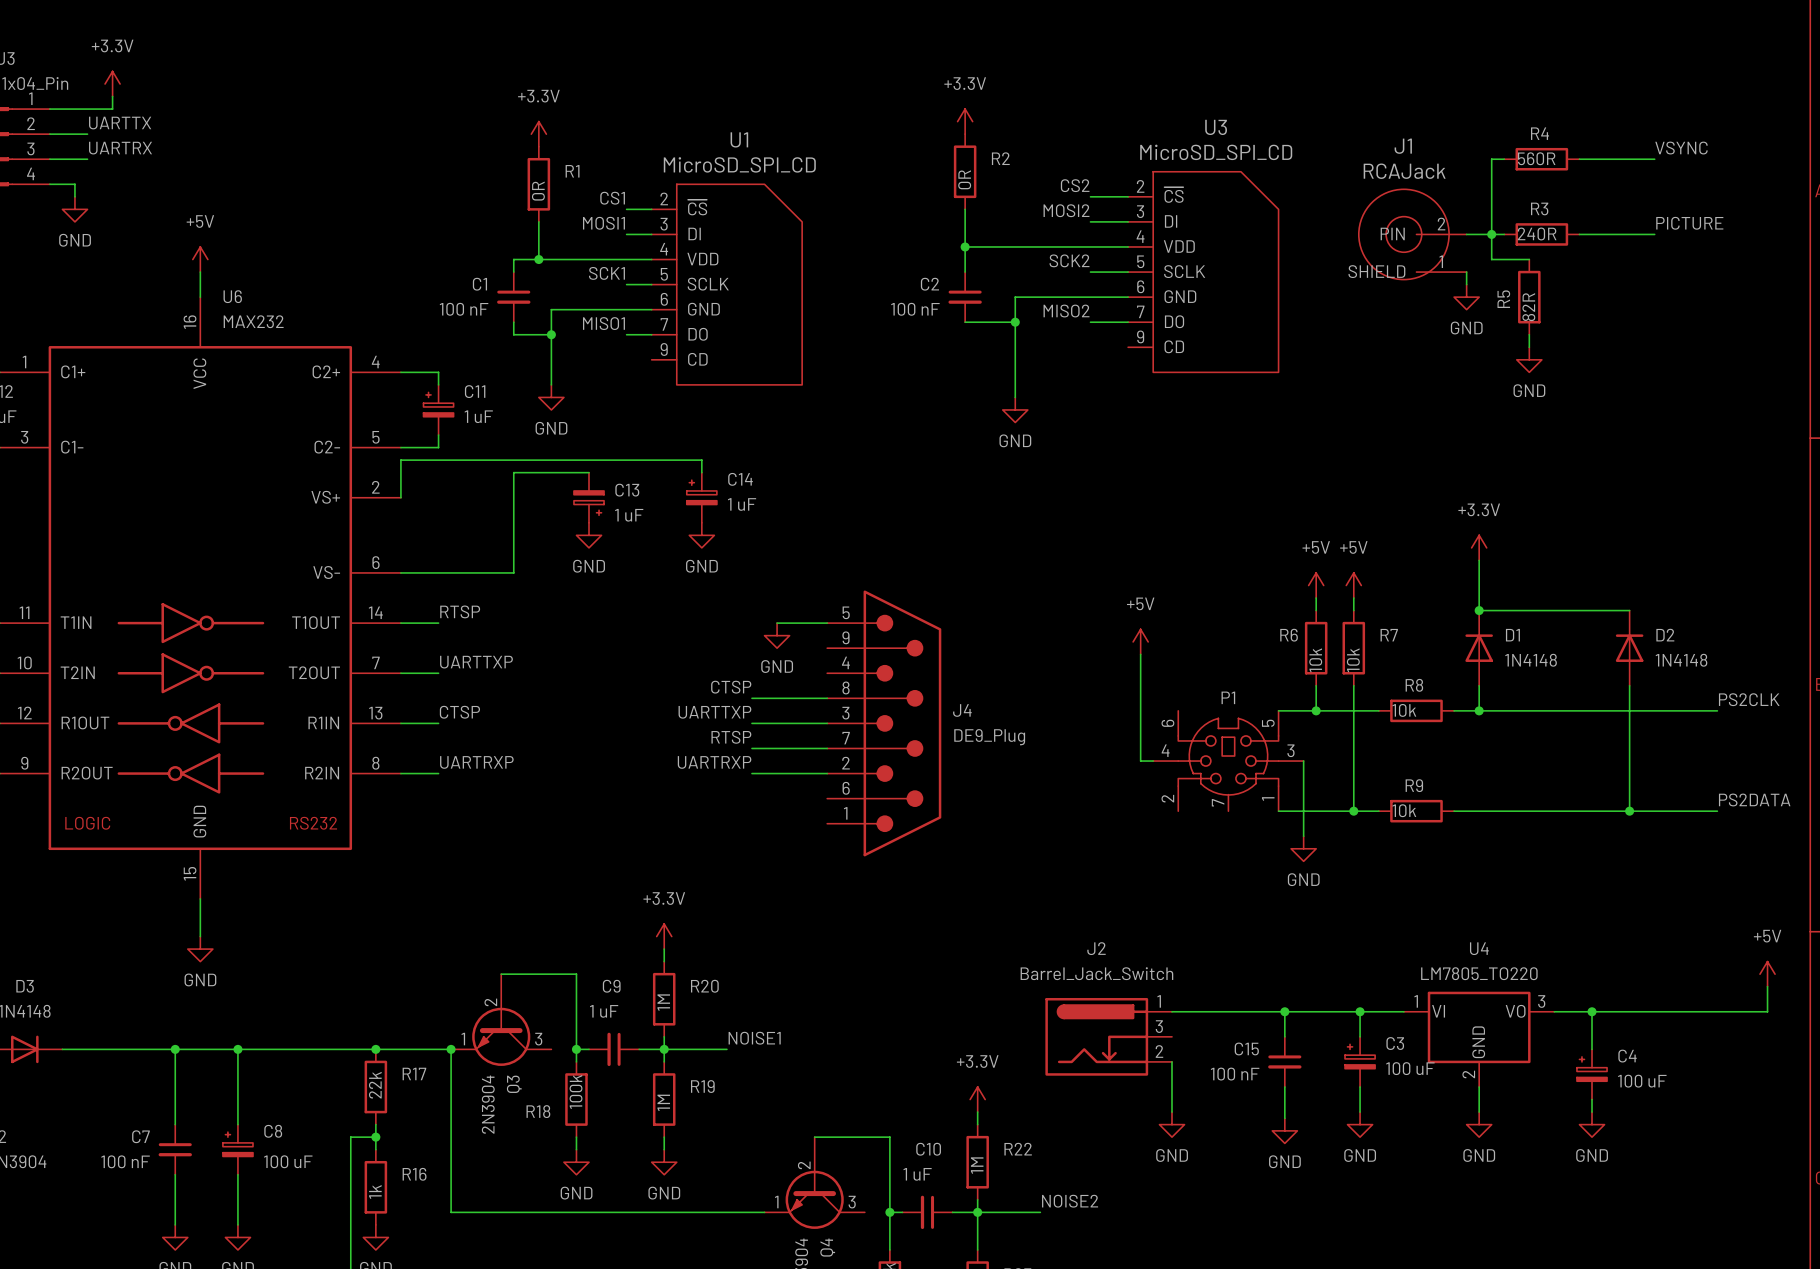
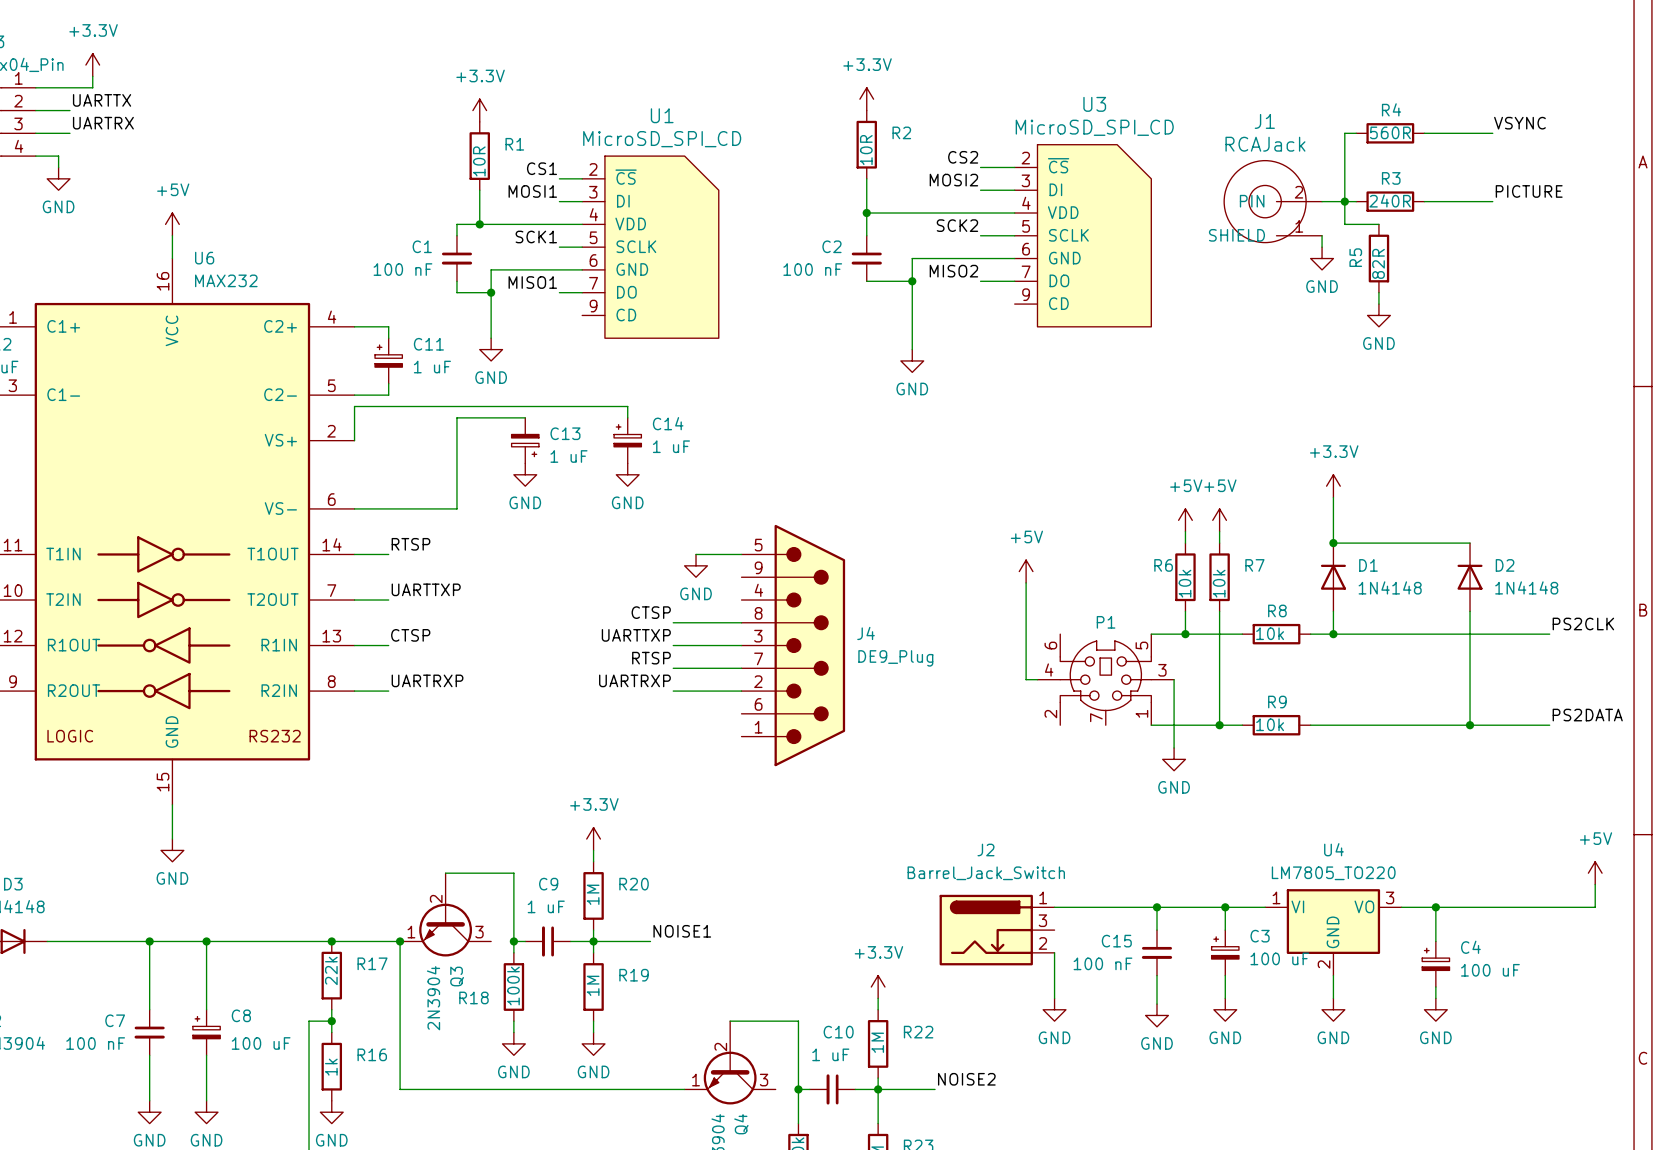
R2 value: 0R (964, 179) -> 10R (866, 150)
R1 value: 0R (538, 191) -> 10R (479, 161)

